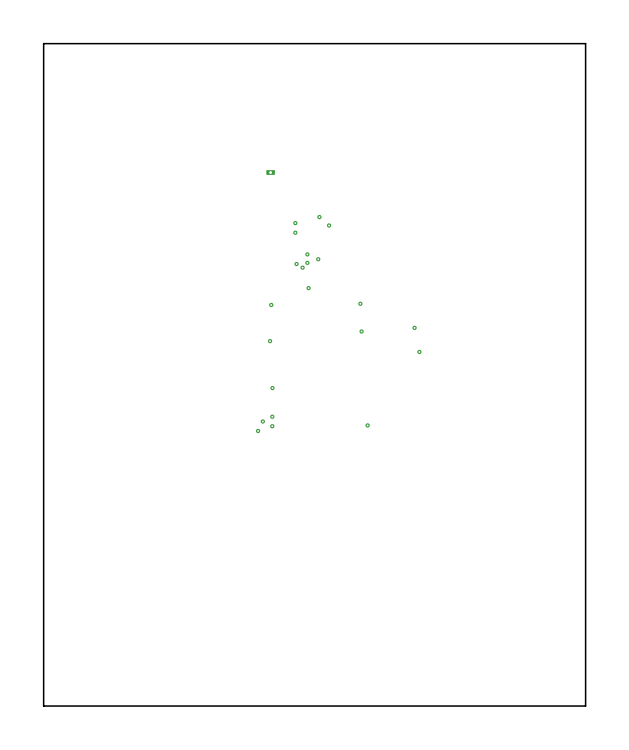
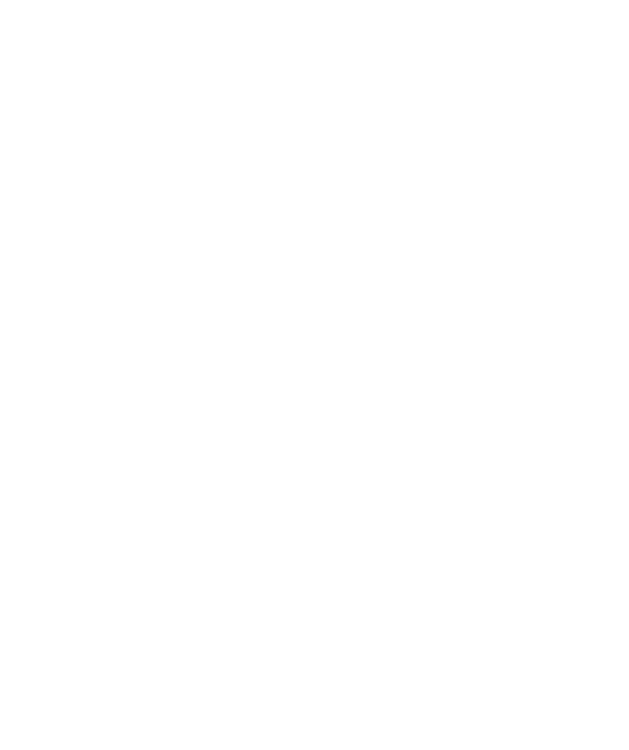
board edge: (585, 43) (43, 43) (43, 706) (585, 706) (585, 43) -> none
part: (270, 172) -> none
via: (319, 217) -> none
via: (295, 223) -> none
via: (329, 225) -> none
via: (295, 232) -> none
via: (307, 254) -> none
via: (318, 259) -> none
via: (307, 262) -> none
via: (296, 264) -> none
via: (302, 267) -> none
via: (308, 288) -> none
via: (360, 303) -> none
via: (271, 304) -> none
via: (414, 327) -> none
via: (361, 331) -> none
via: (270, 341) -> none
via: (419, 351) -> none
via: (272, 388) -> none
via: (272, 416) -> none
via: (262, 421) -> none
via: (367, 425) -> none
via: (272, 426) -> none
via: (258, 430) -> none

